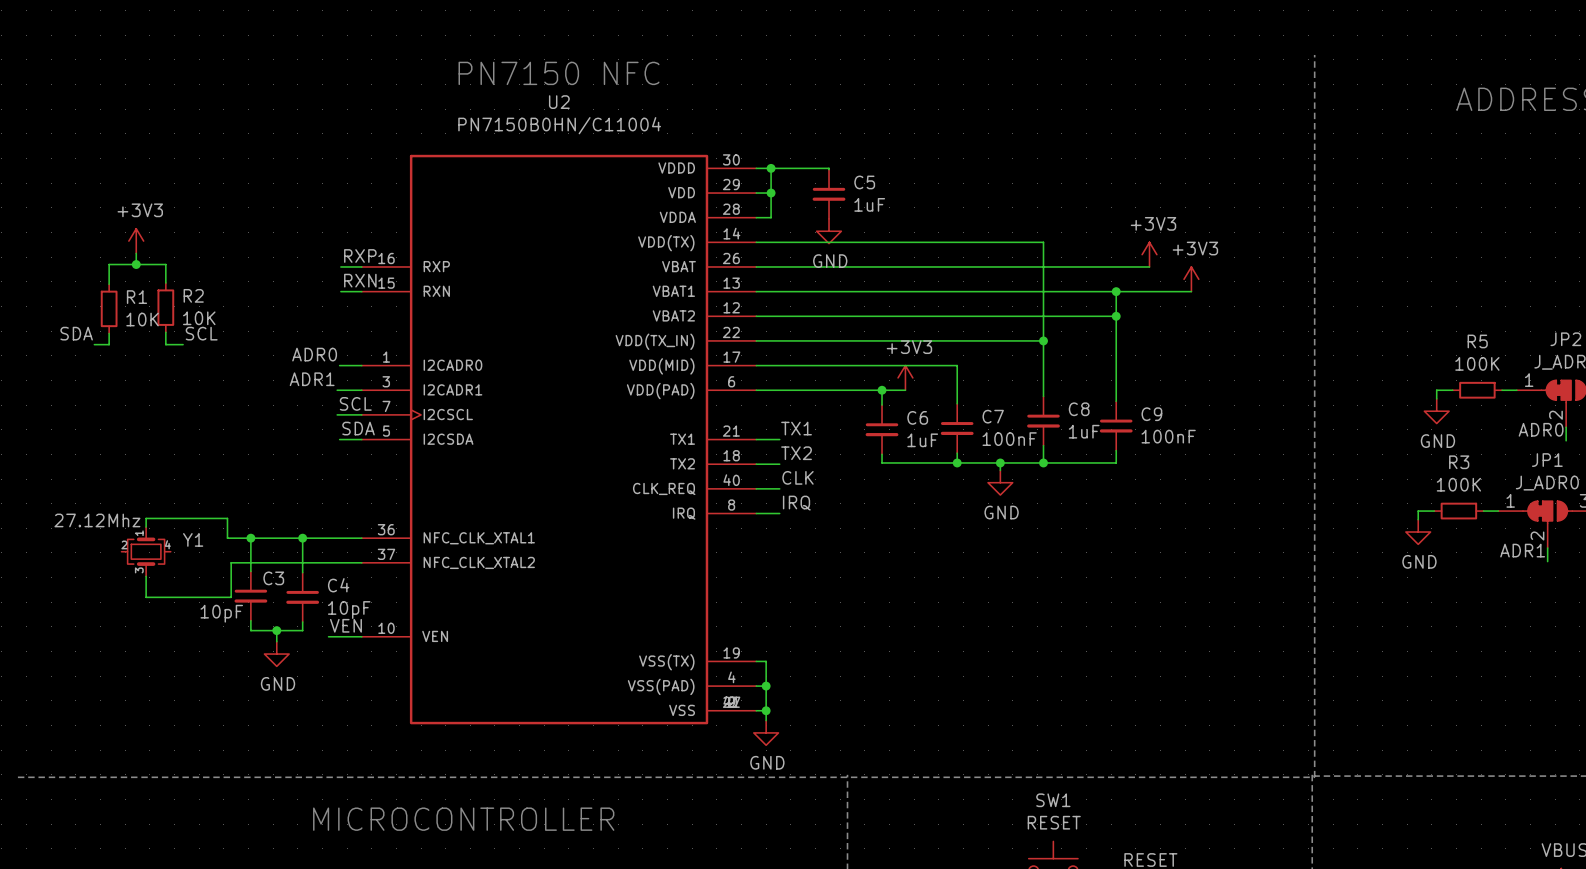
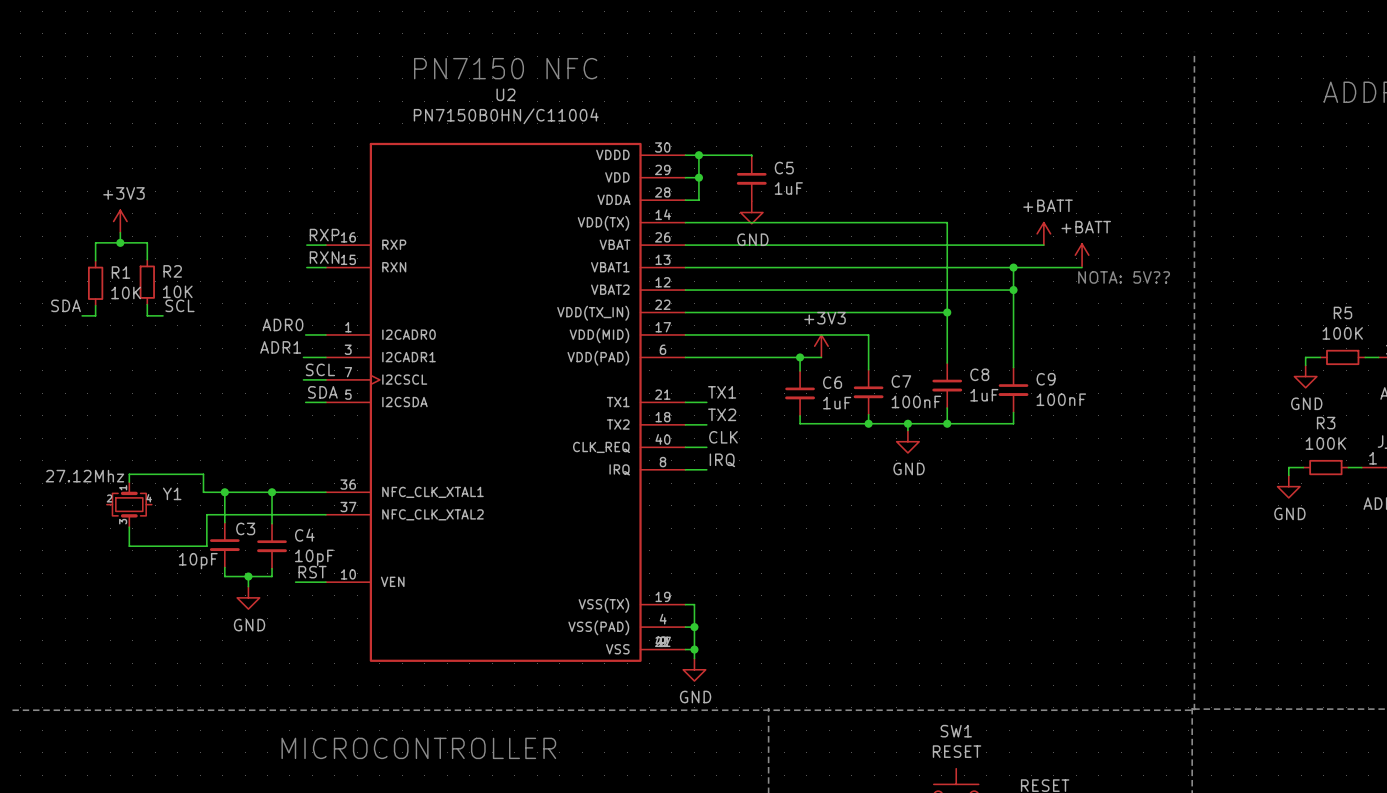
power symbol: +3V3 (1149, 254) -> +BATT (1043, 233)
power symbol: +3V3 (1191, 279) -> +BATT (1082, 255)
text: none -> NOTA: 5V?? (1124, 277)
label: VEN (345, 625) -> RST (312, 572)

